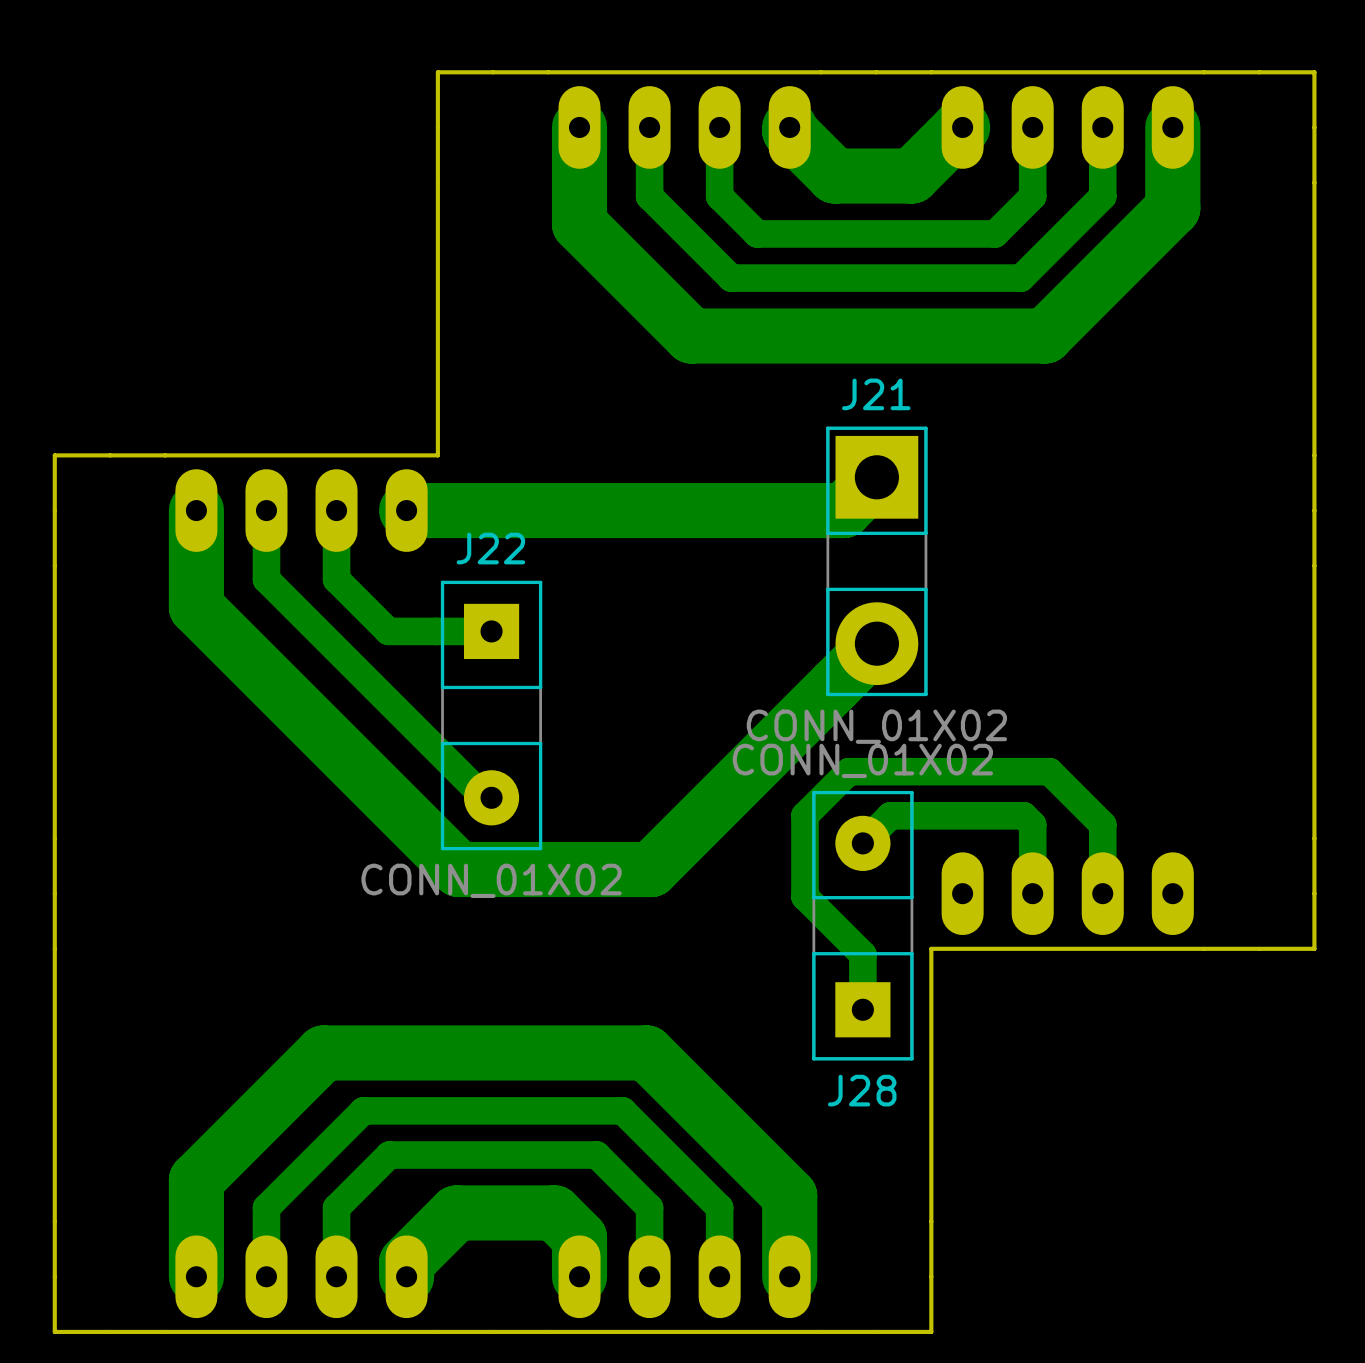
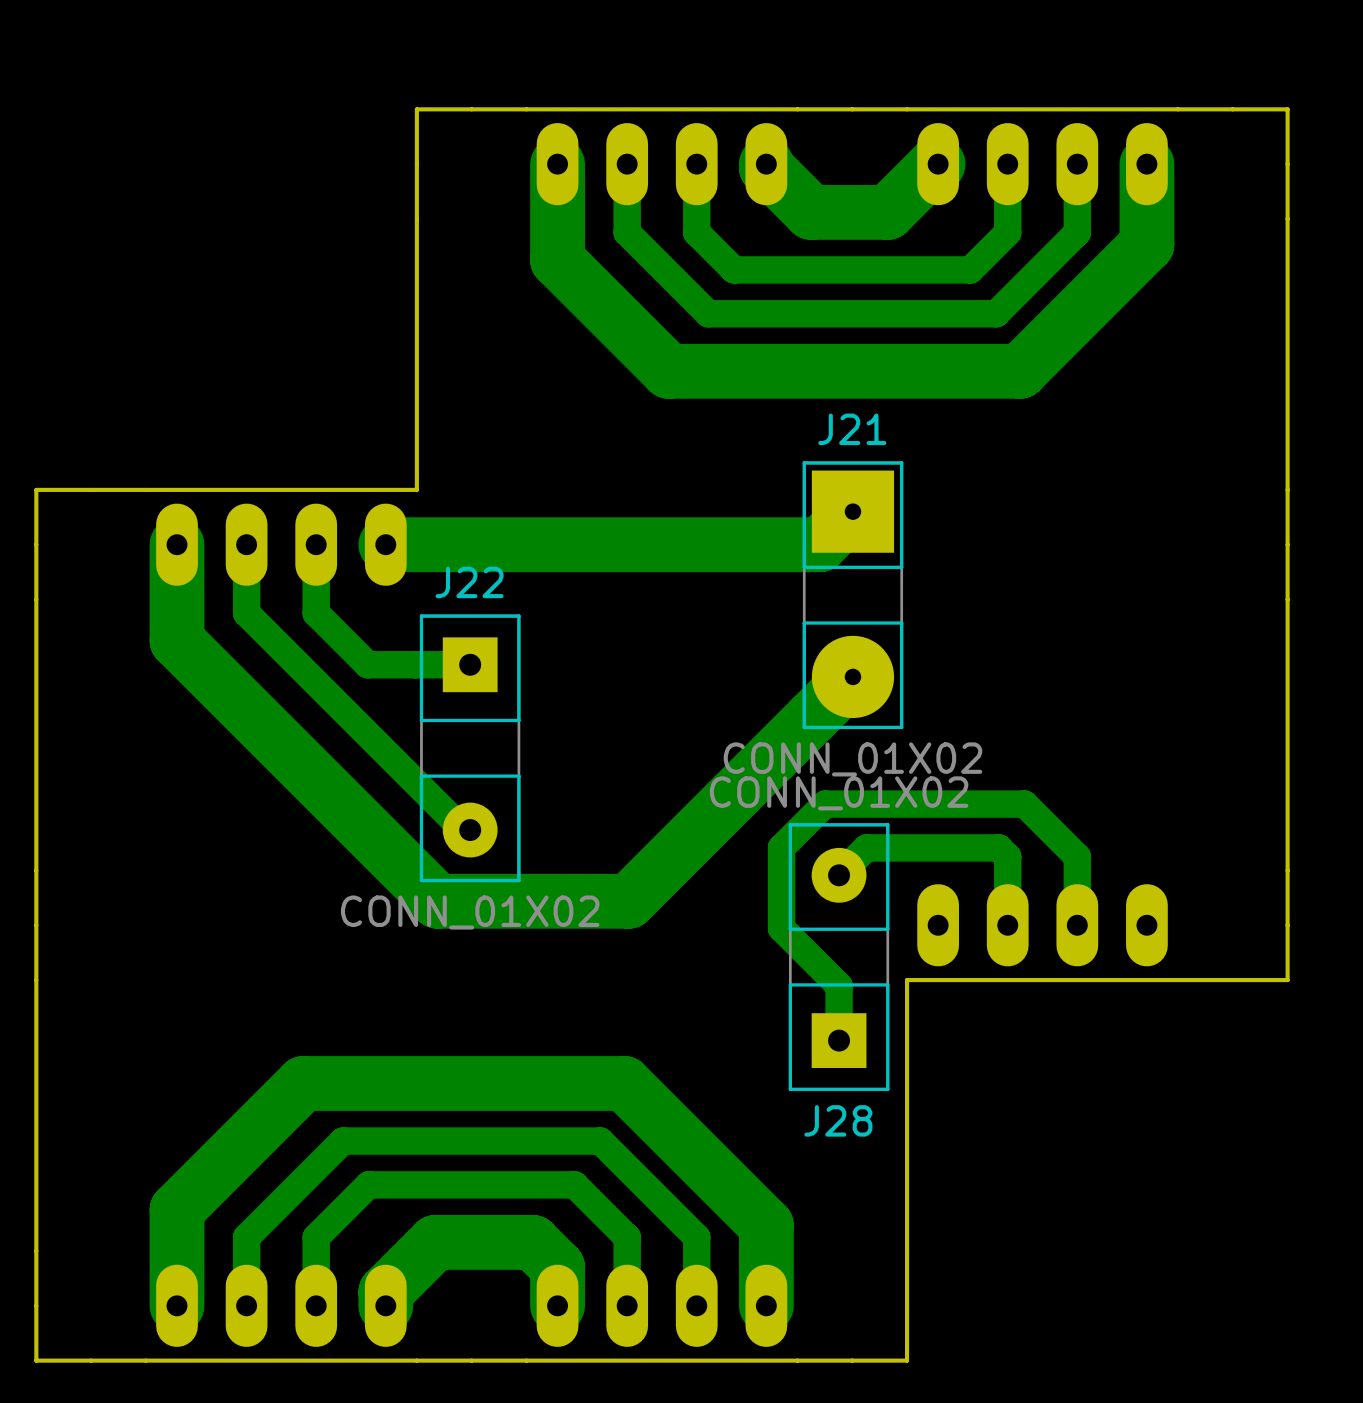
J21 footprint: [826, 426, 928, 697] -> [802, 461, 904, 730]

